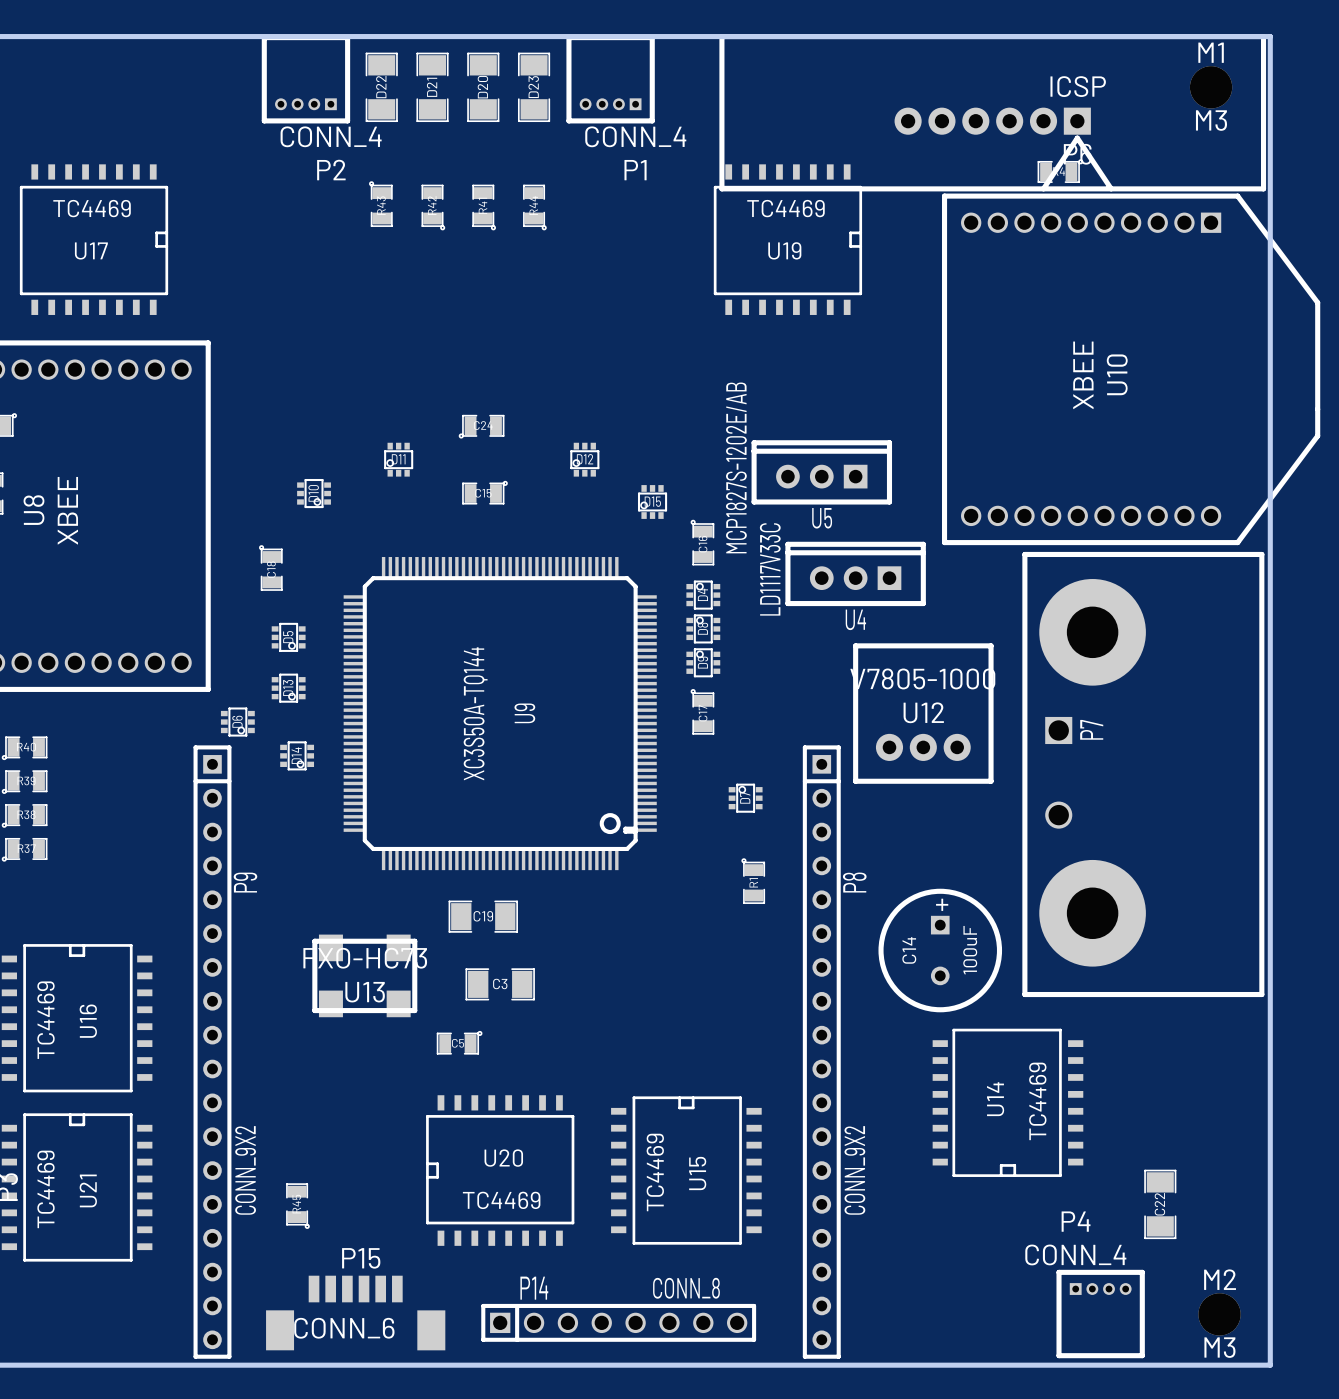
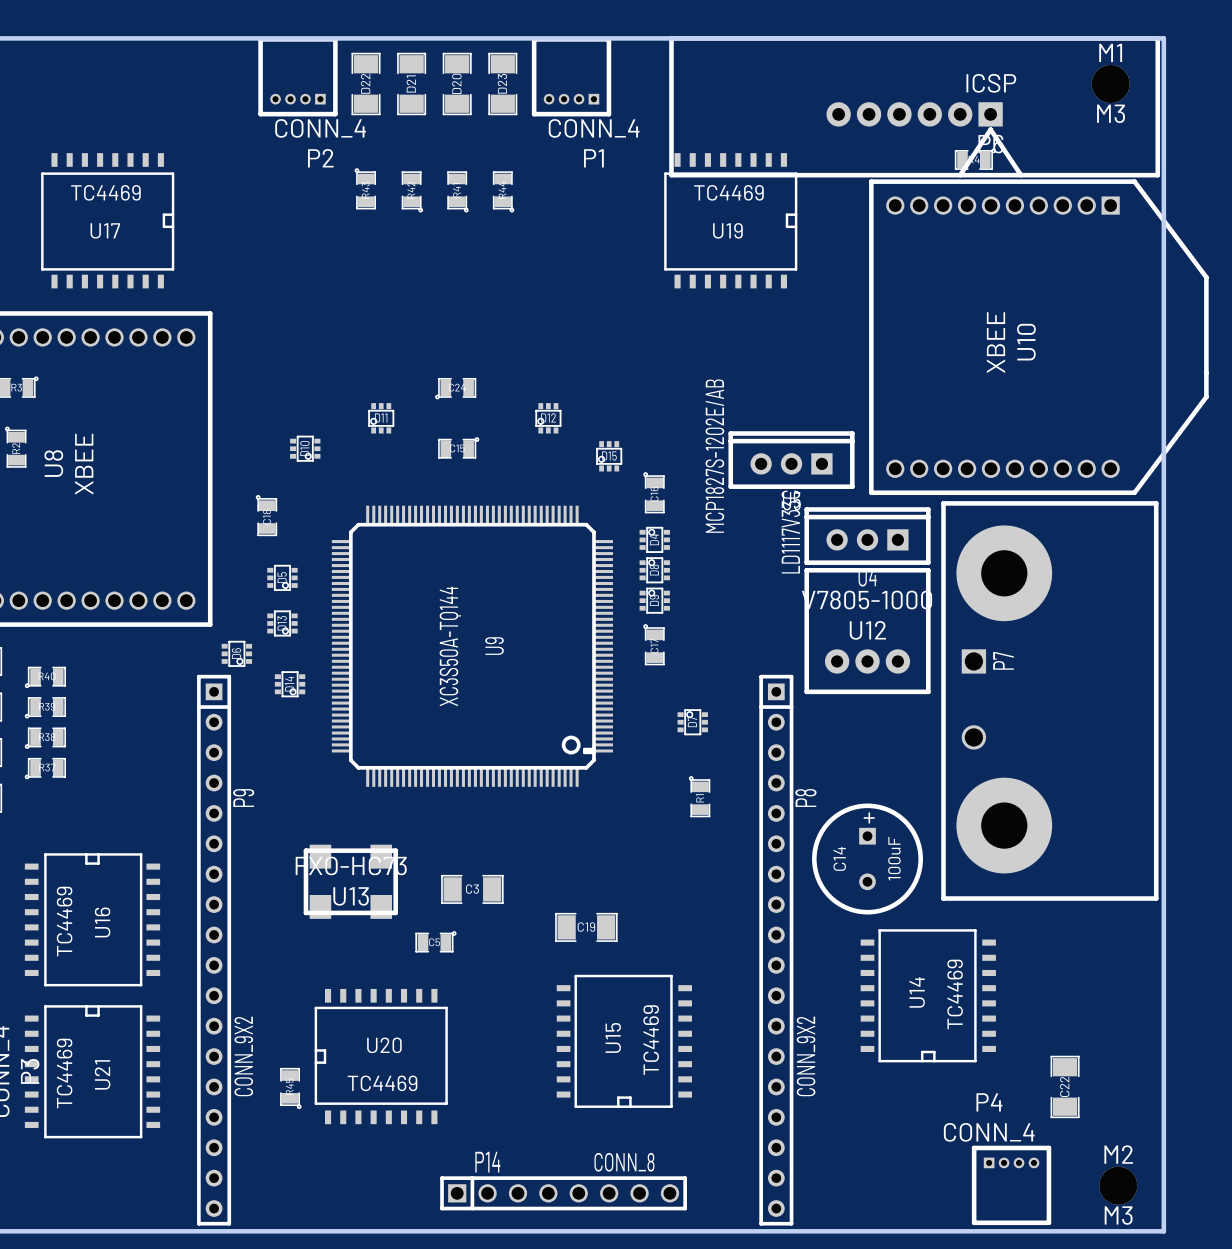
U5 position: (821, 472) -> (791, 460)
U4 position: (855, 573) -> (867, 536)
U12 position: (923, 713) -> (867, 631)
C19 position: (483, 916) -> (586, 927)
P8 position: (821, 1052) -> (776, 950)
U20 position: (500, 1170) -> (381, 1056)
U15 rotation: 0° (686, 1170) -> 180° (624, 1041)
P15: CONN_6 (355, 1313) -> none
P14 position: (618, 1322) -> (563, 1193)

